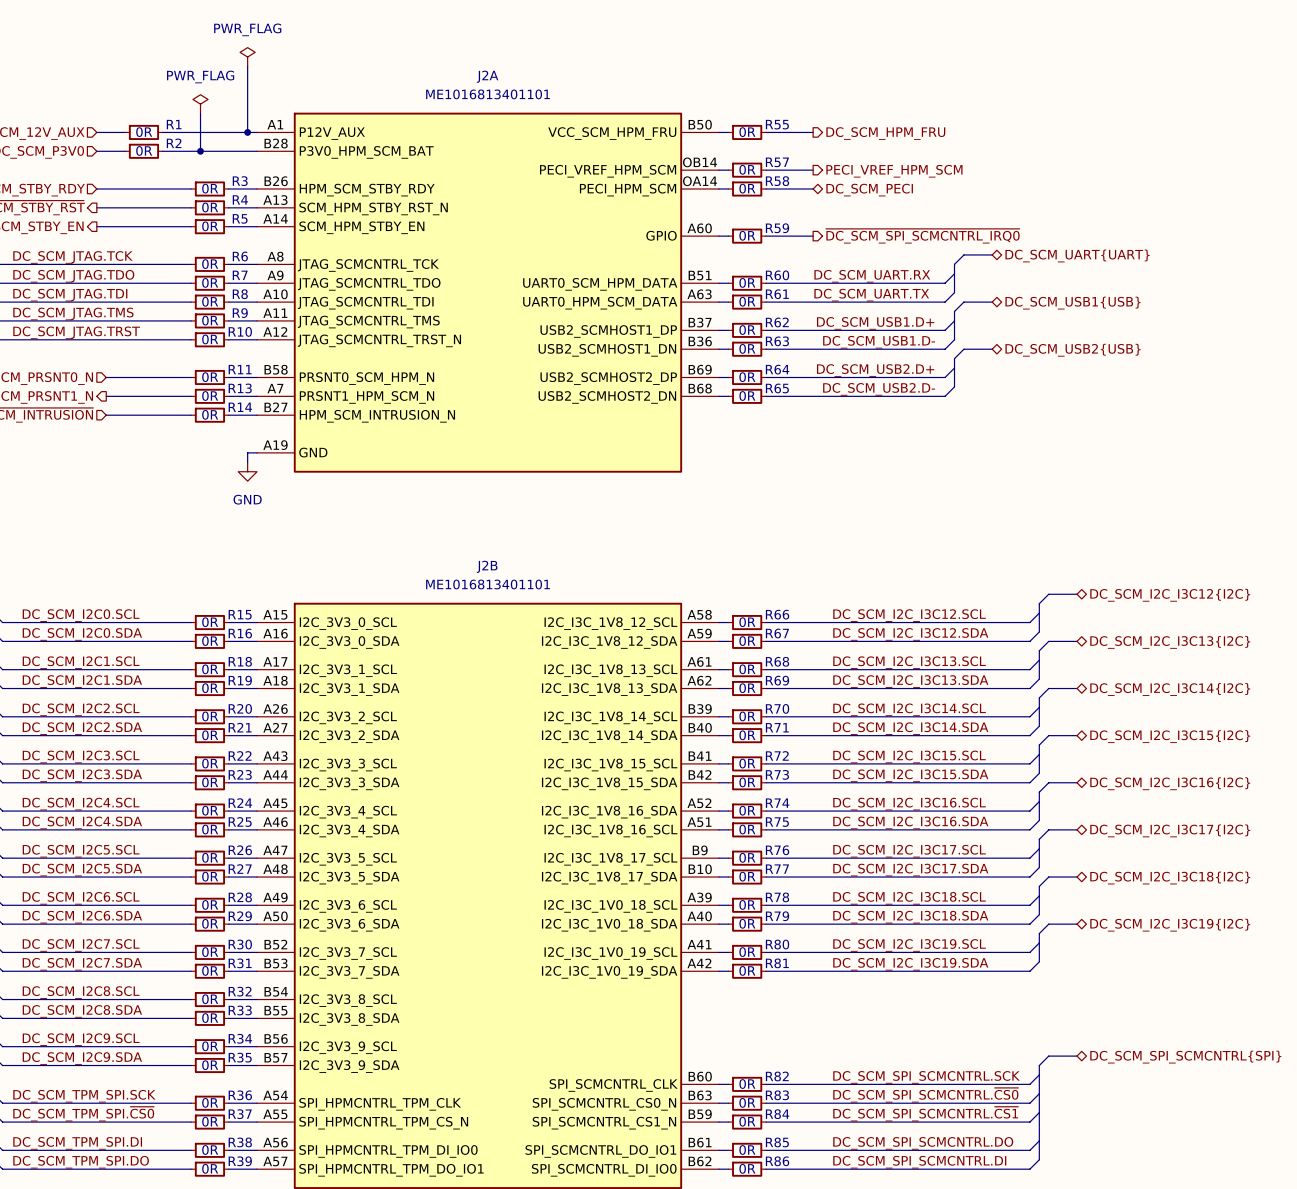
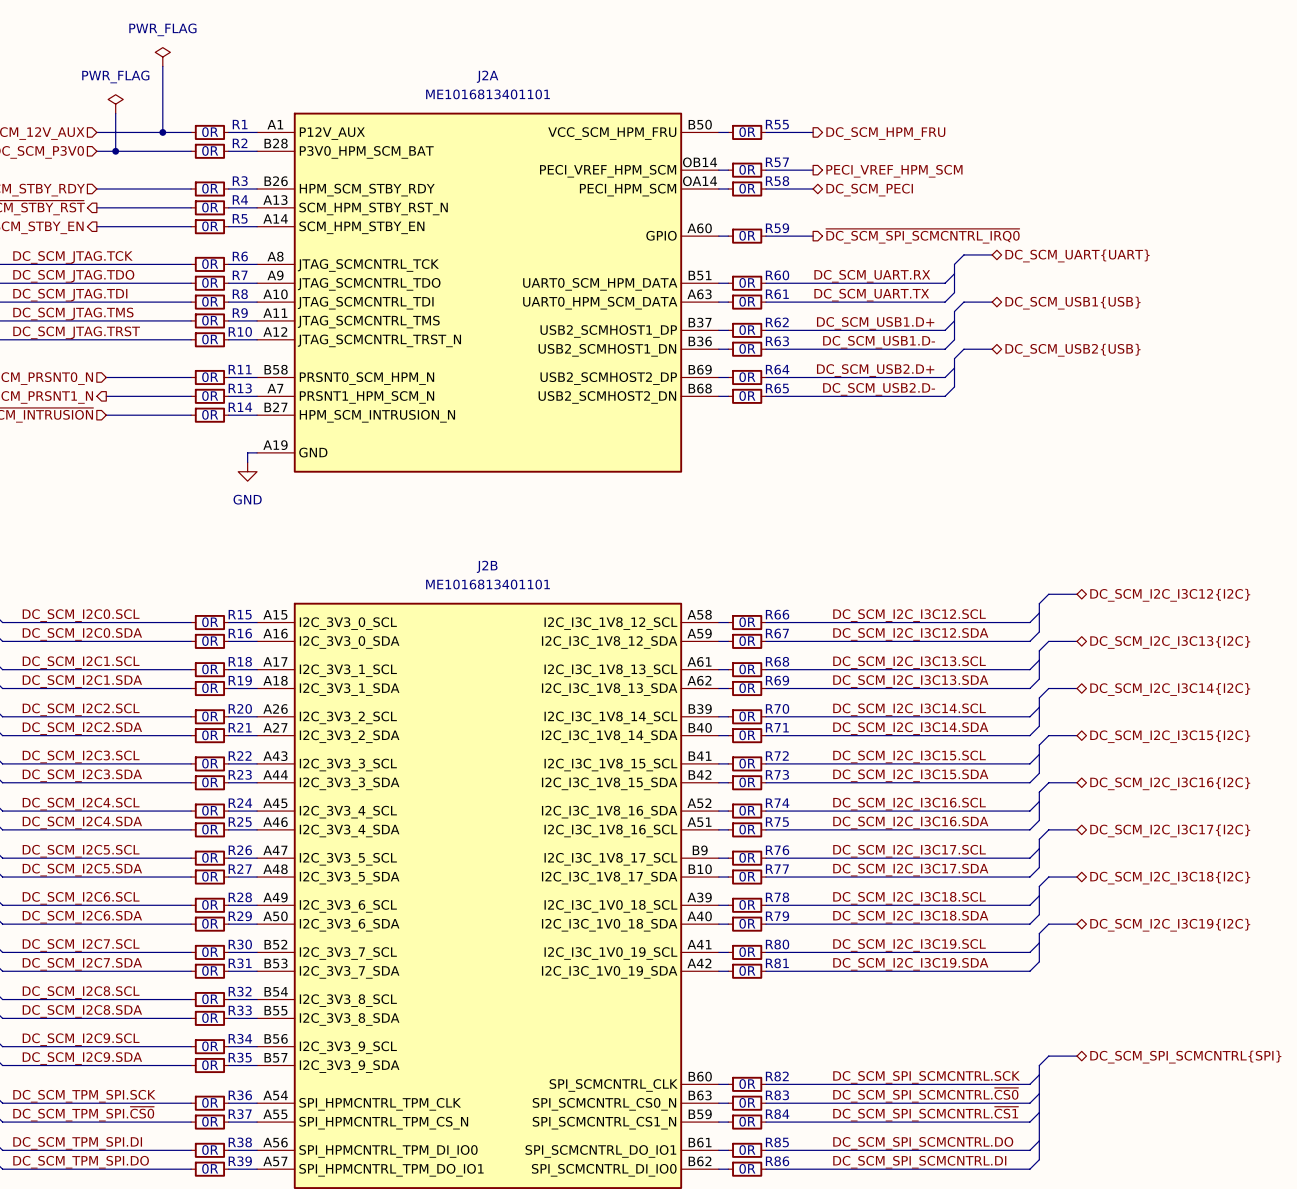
power symbol: none -> PWR_FLAG (162, 57)
power symbol: PWR_FLAG (247, 57) -> none
wire: none -> (162, 66) (162, 132) (125, 132)
wire: (247, 66) (247, 132) -> none
power symbol: none -> PWR_FLAG (115, 104)
power symbol: PWR_FLAG (200, 104) -> none
wire: (200, 113) (200, 151) -> (115, 113) (115, 151)
R1 position: (143, 132) -> (209, 132)
junction: (247, 132) -> none
junction: none -> (115, 151)
R2 position: (143, 151) -> (209, 151)
junction position: (200, 151) -> (162, 132)

